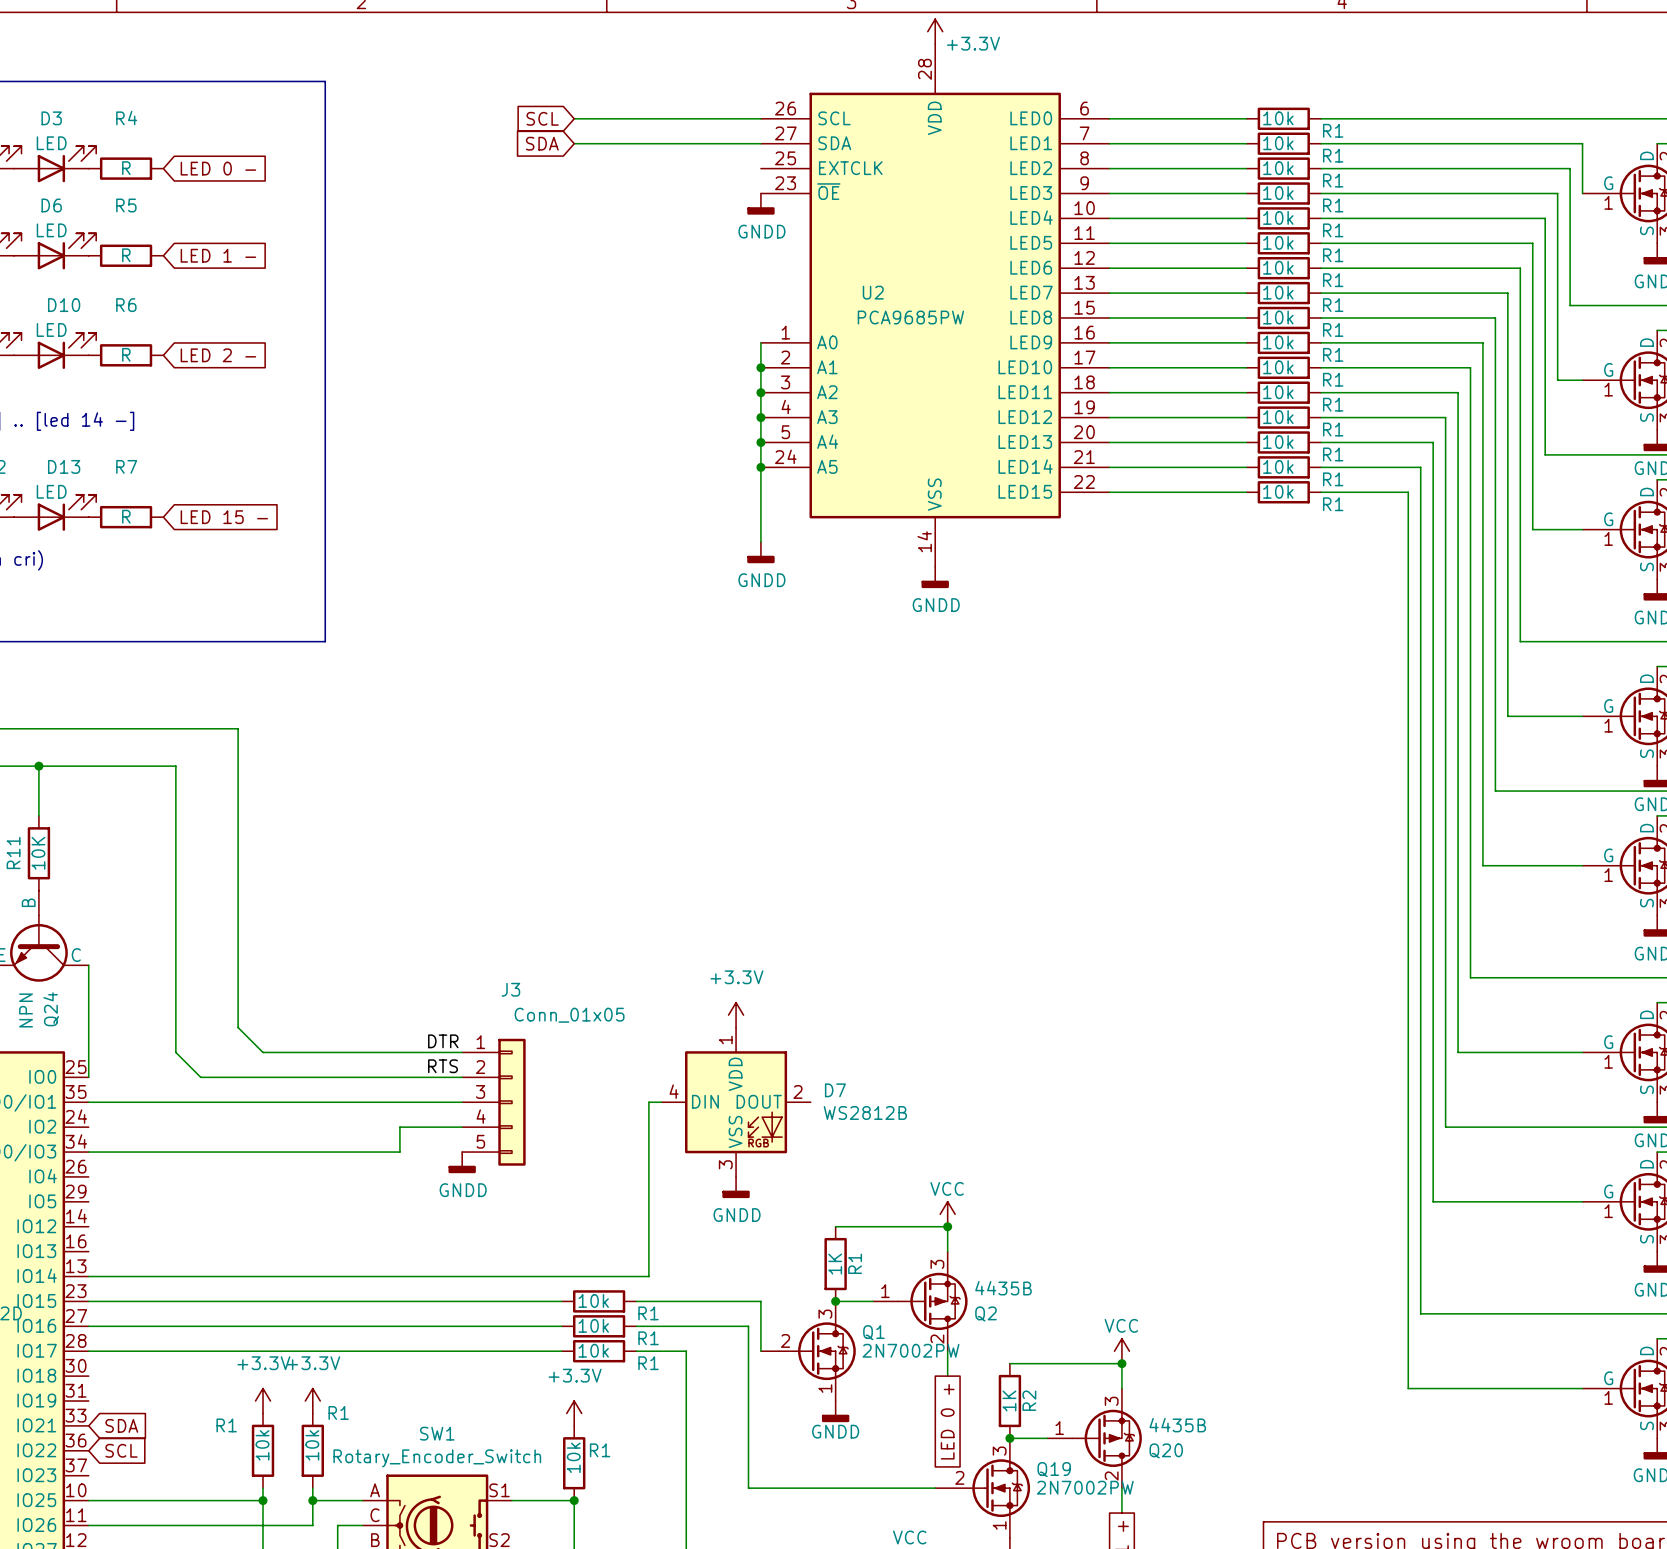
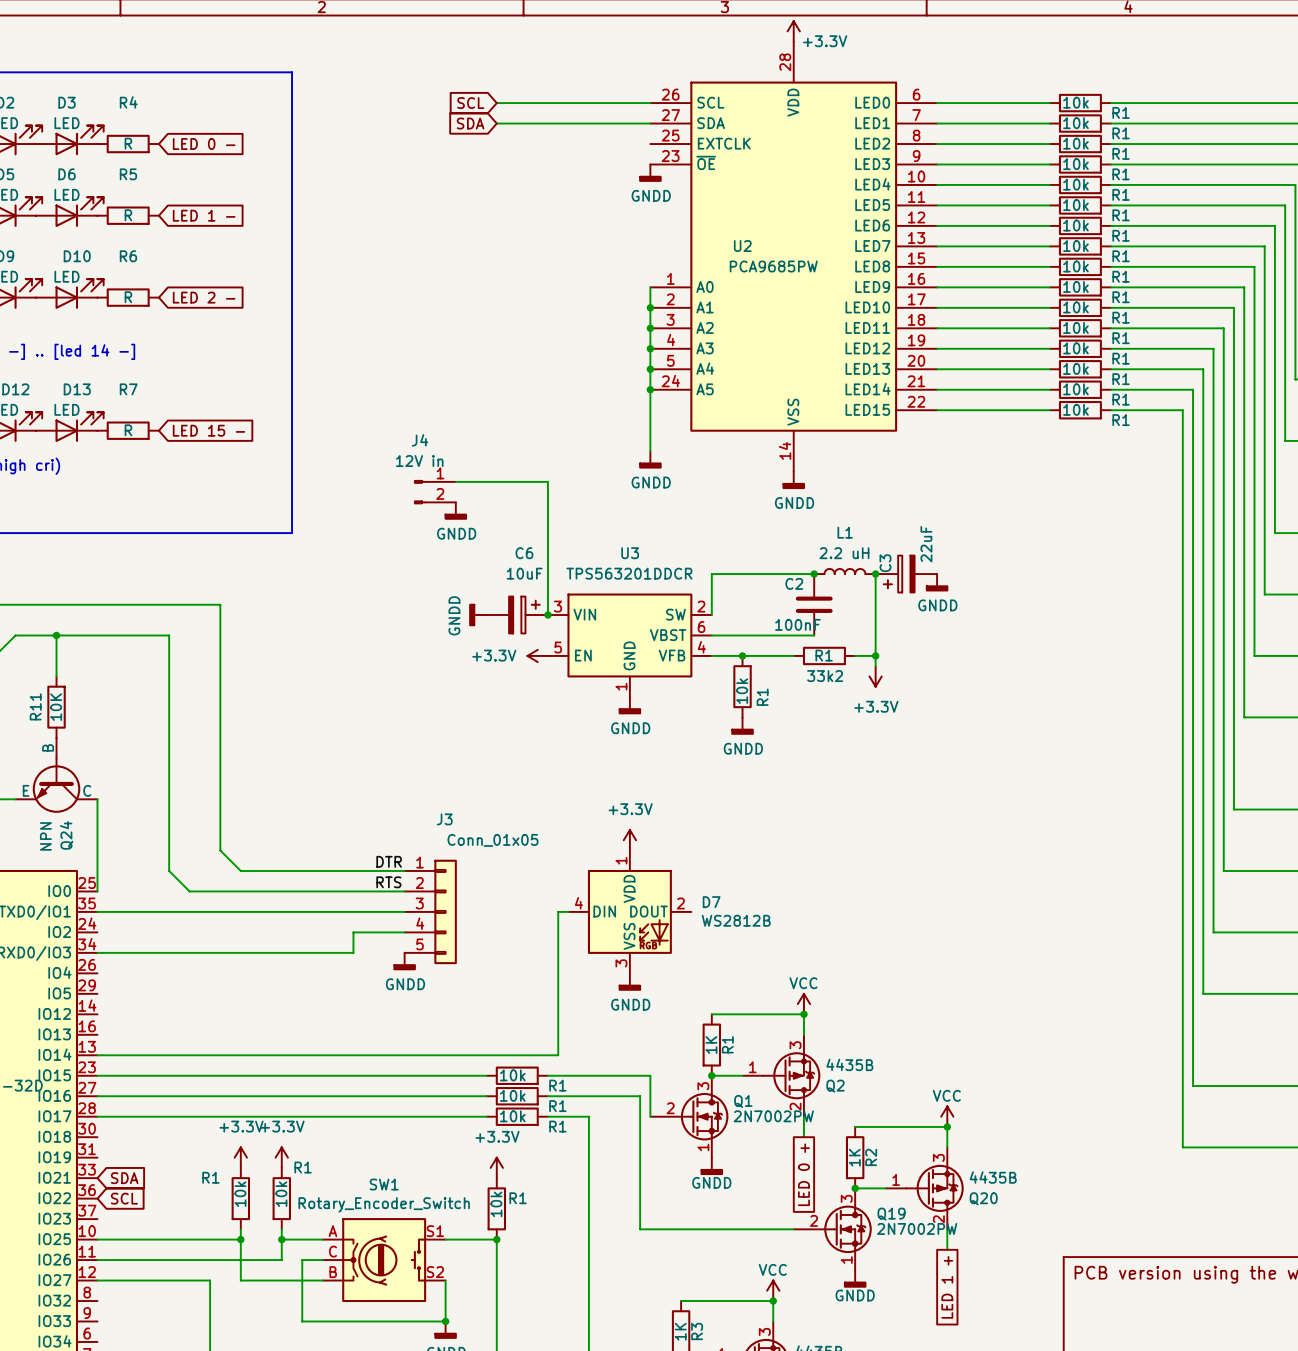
wire: none -> (455, 481) (547, 481) (547, 615)
J4: none -> 12V in (435, 492)
power symbol: none -> GNDD (455, 511)
L1: none -> 2.2 uH (844, 571)
wire: none -> (814, 574) (711, 574) (711, 615)
junction: none -> (814, 574)
wire: none -> (875, 574) (875, 666)
junction: none -> (875, 574)
C3: none -> 22uF (906, 574)
power symbol: none -> GNDD (937, 582)
C2: none -> 100nF (814, 604)
power symbol: none -> GNDD (477, 615)
C6: none -> 10uF (517, 615)
junction: none -> (547, 615)
wire: none -> (711, 635) (814, 635)
U3: none -> TPS563201DDCR (629, 645)
power symbol: none -> +3.3V (537, 655)
wire: none -> (711, 655) (793, 655)
junction: none -> (742, 655)
R1: none -> 33k2 (824, 655)
wire: none -> (855, 655) (875, 655)
junction: none -> (875, 655)
power symbol: none -> +3.3V (875, 676)
R1: none -> 10k (742, 686)
power symbol: none -> GNDD (629, 705)
power symbol: none -> GNDD (742, 726)

